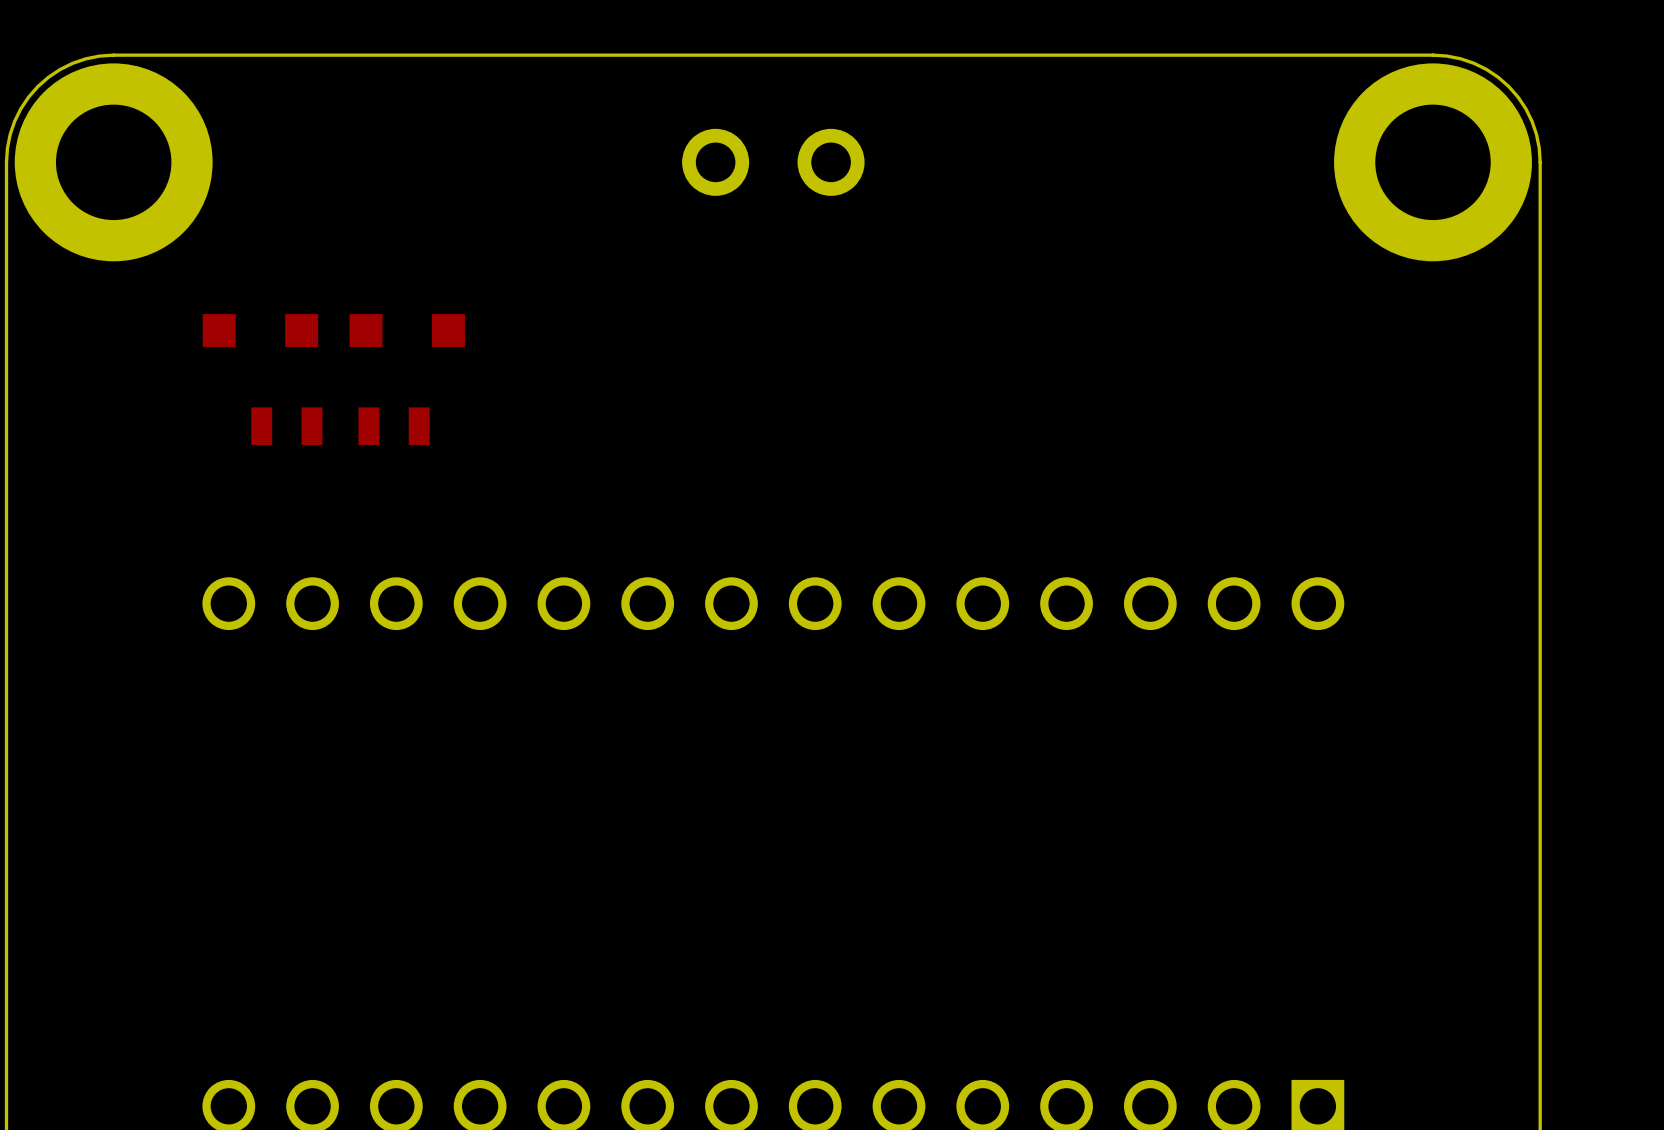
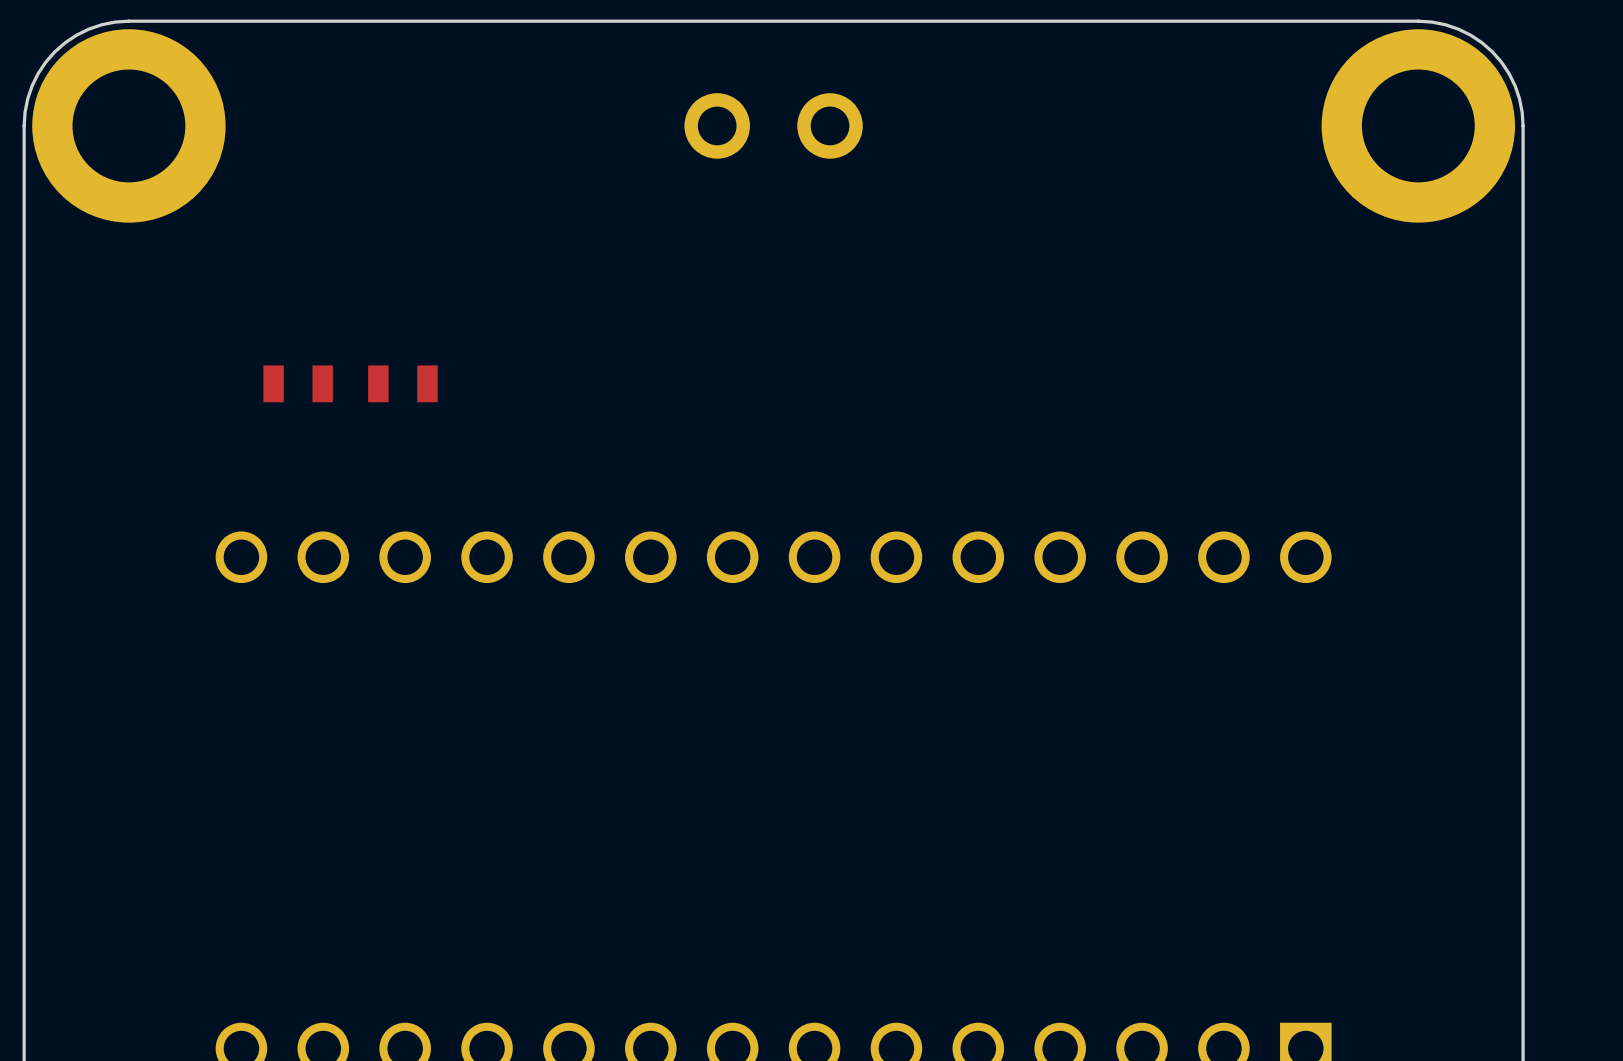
part: (260, 330) -> none
part: (407, 330) -> none

